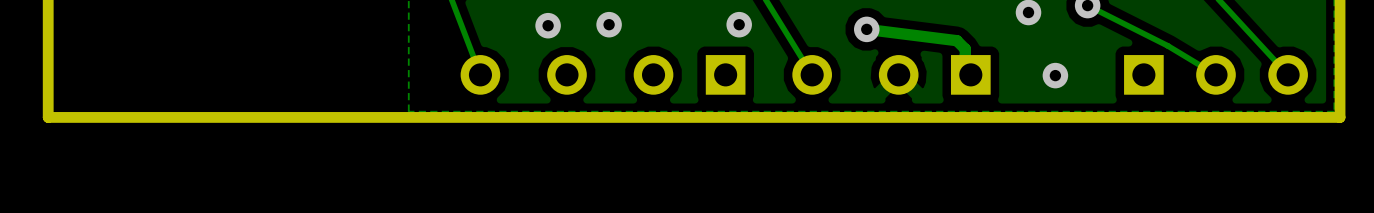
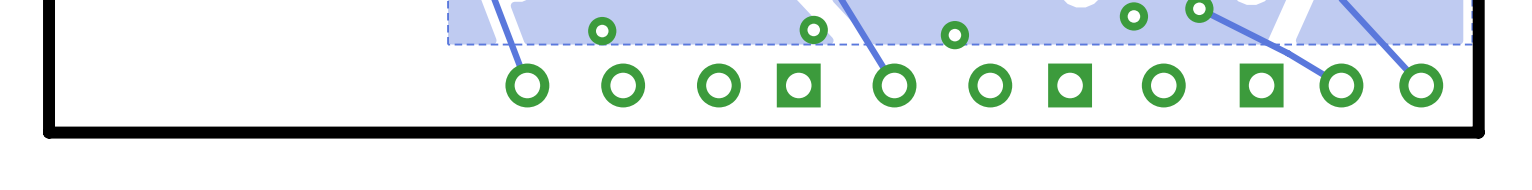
via: (609, 24) -> none
track: (866, 29) (956, 40) (965, 49) (965, 60) (970, 74) -> none
zone outline: (1334, 37) (1334, 111) (408, 111) (408, 37) -> (1472, 44) (448, 44)
part: none -> (1163, 85)
via: (1055, 75) -> none

